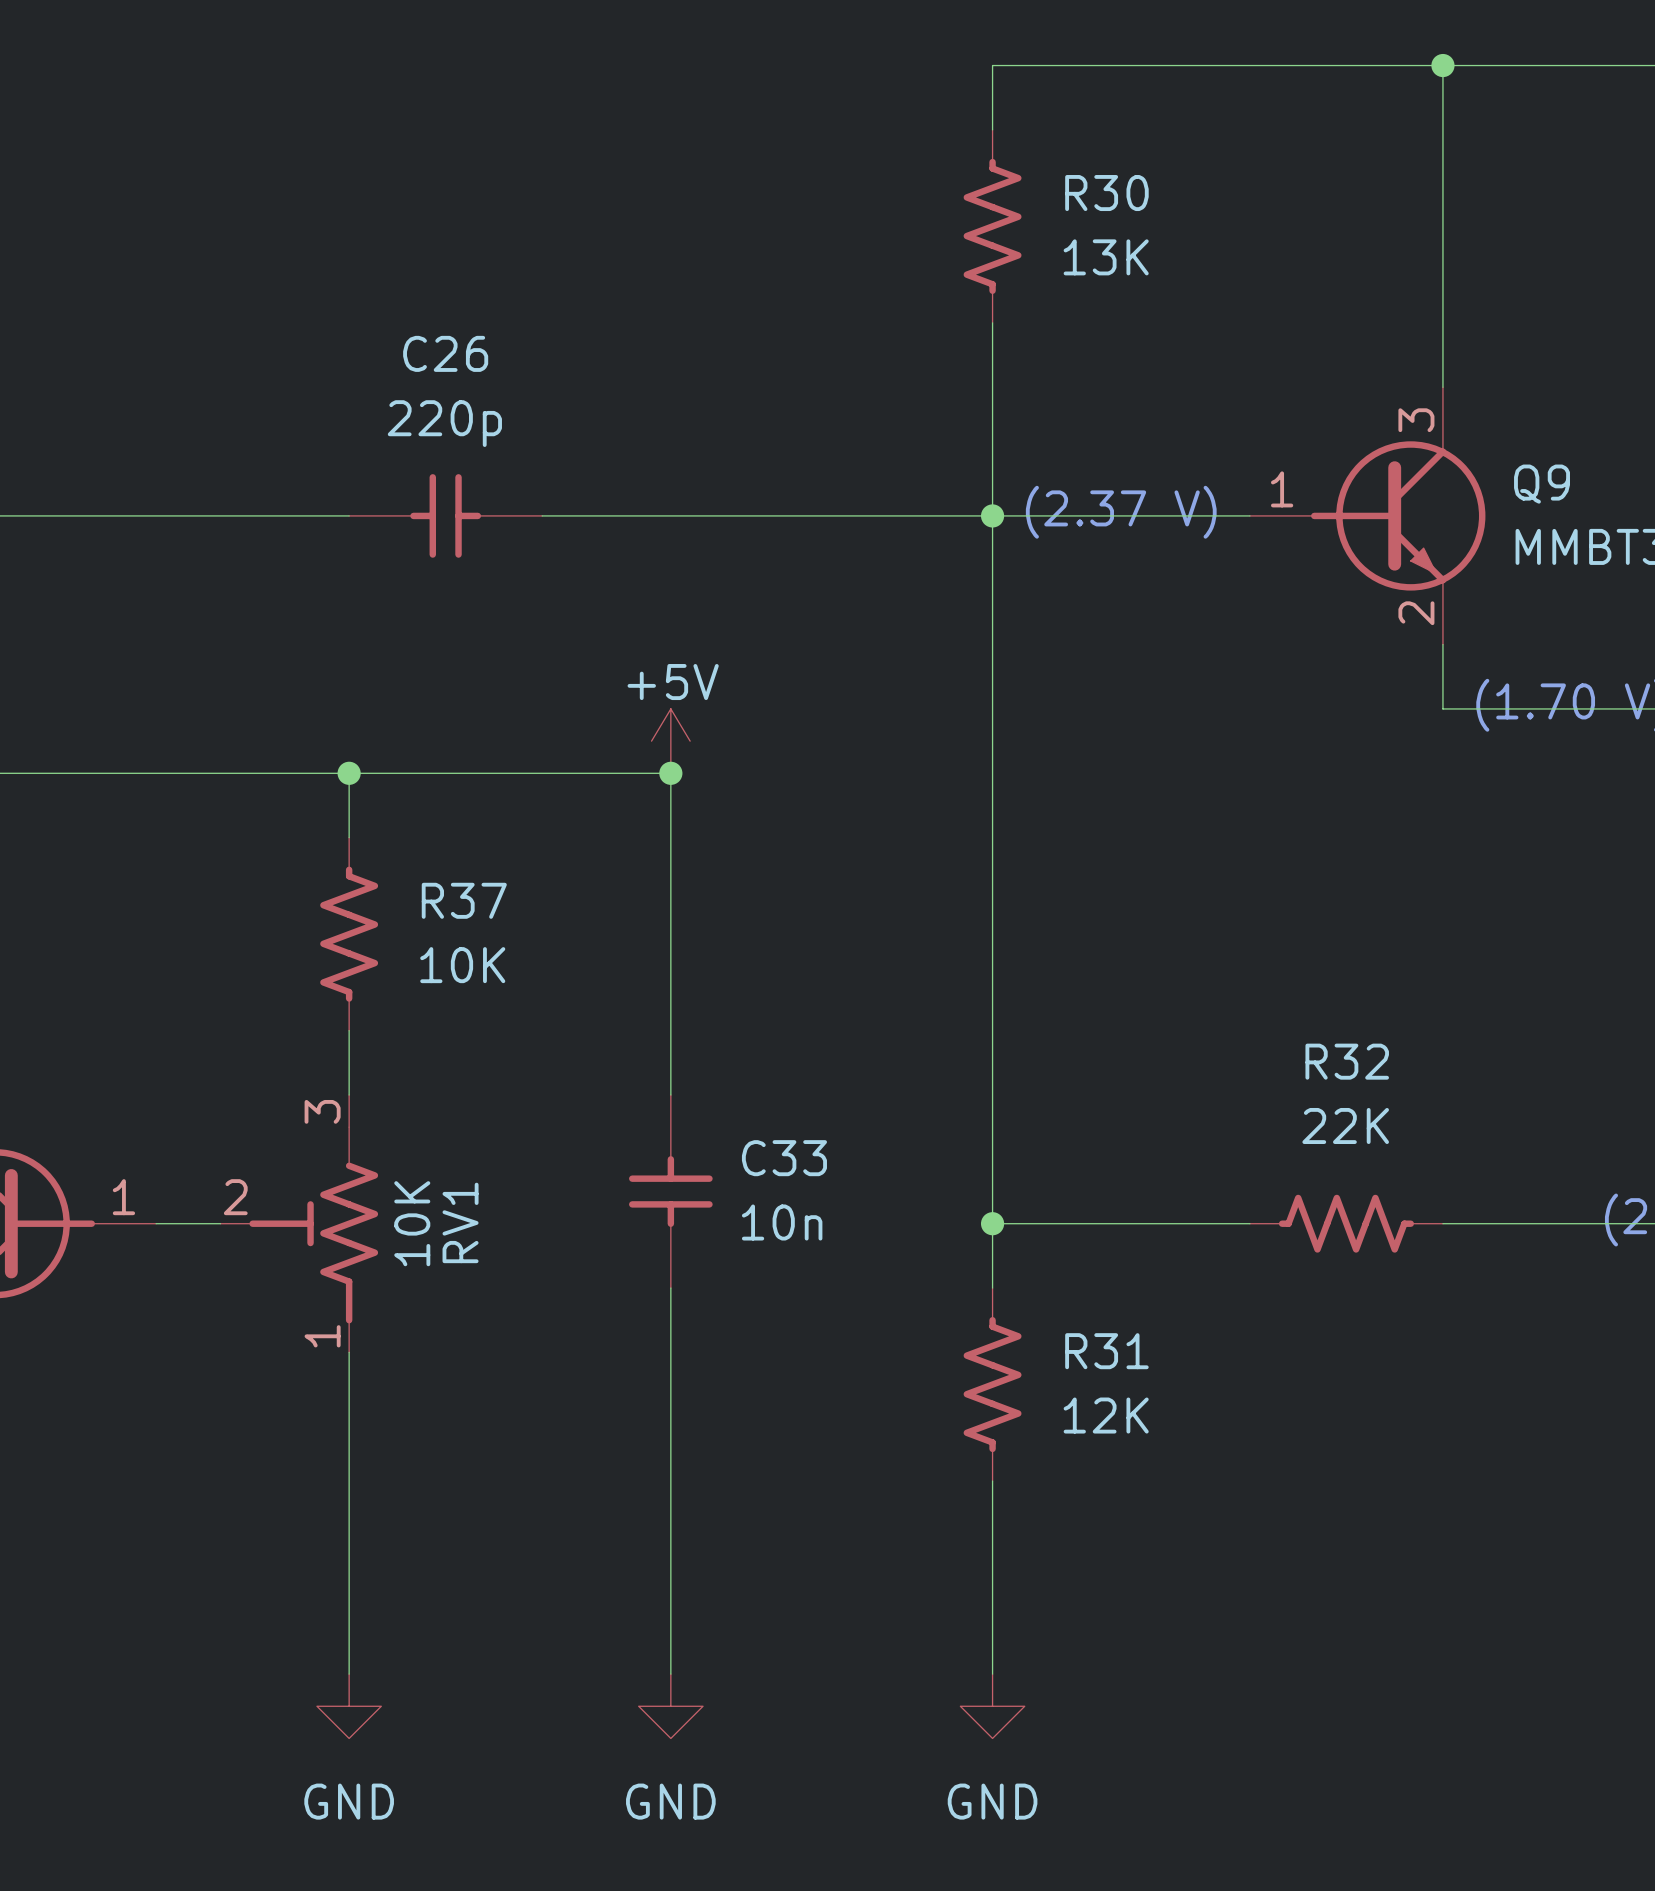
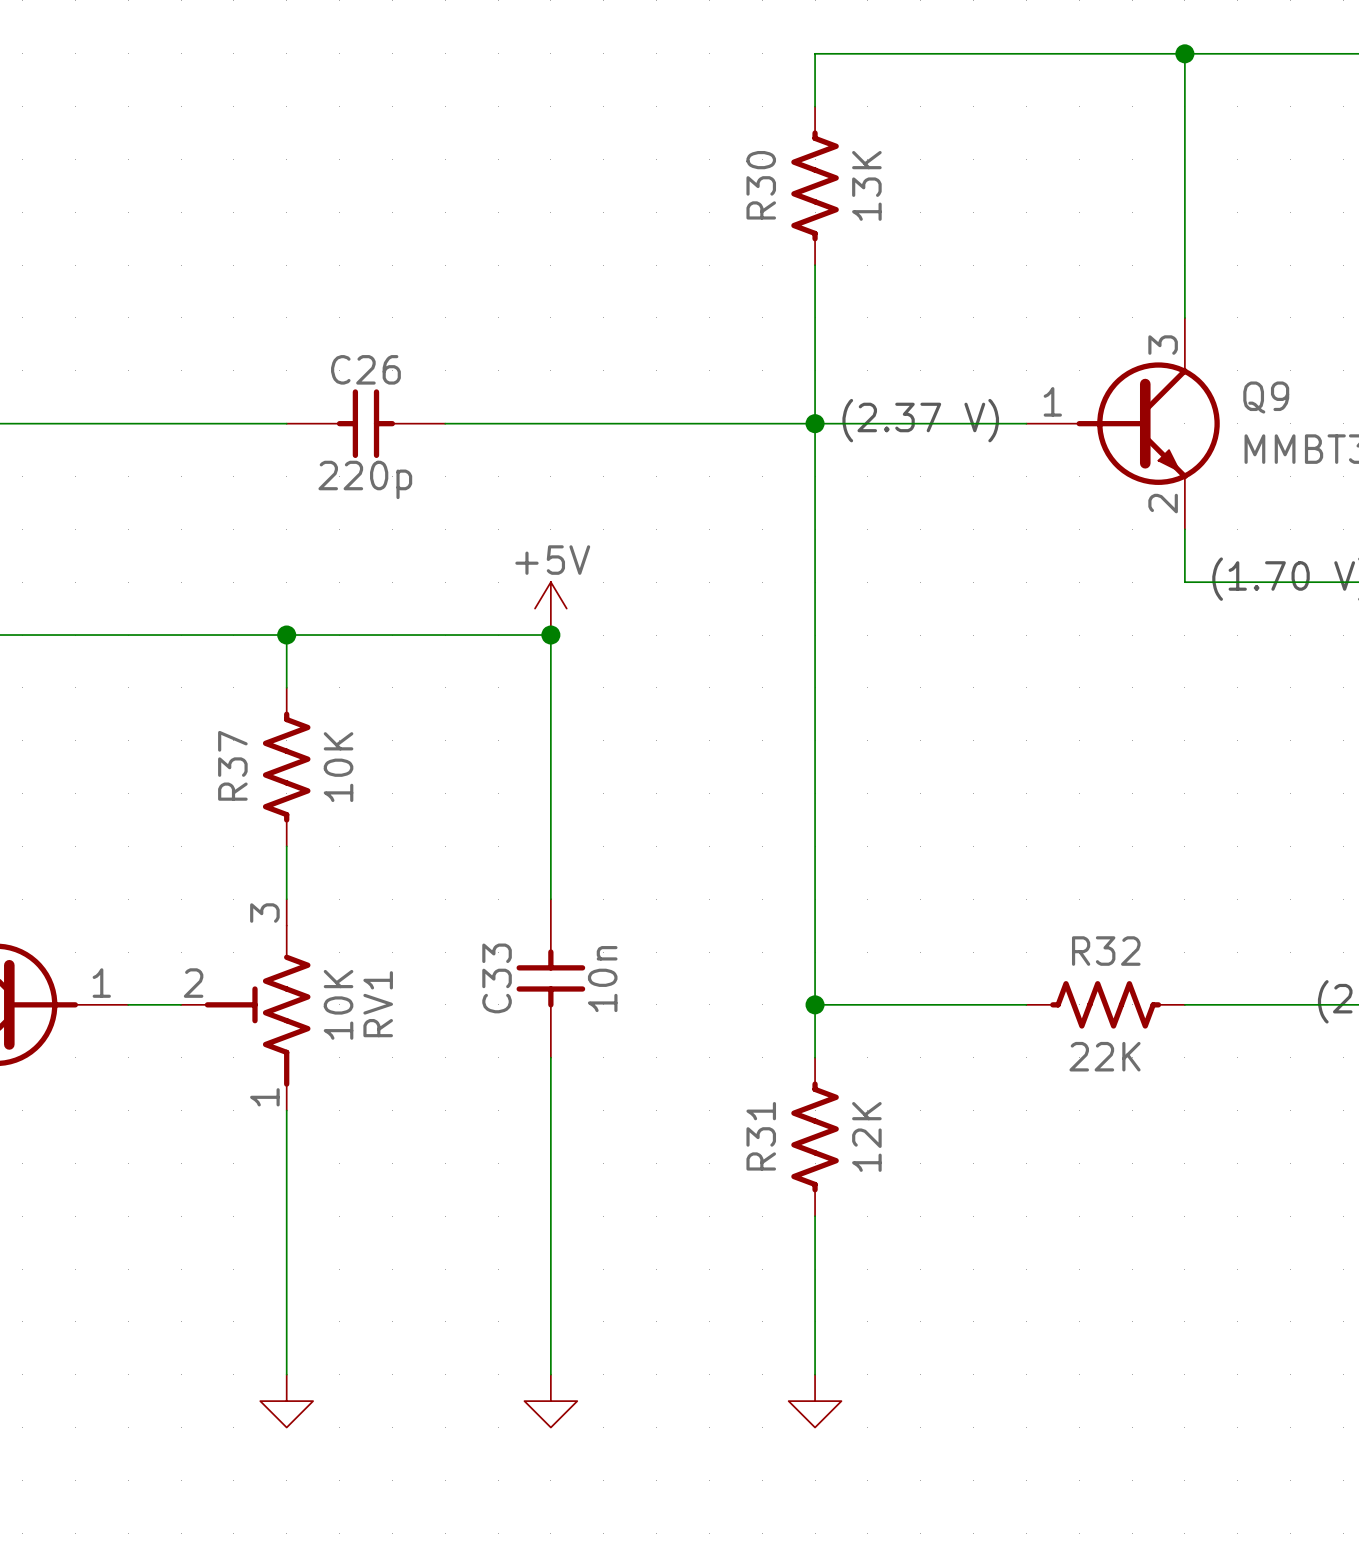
R30 name rotation: 0° (1106, 193) -> 90° counterclockwise (761, 185)
R30 name position: R30 (1106, 193) -> R30 (761, 185)
R30 value rotation: 0° (1106, 257) -> 90° counterclockwise (866, 185)
C26 name position: C26 (445, 353) -> C26 (365, 369)
C26 value position: 220p (444, 423) -> 220p (365, 479)
R37 name rotation: 0° (464, 900) -> 90° counterclockwise (232, 765)
R37 name position: R37 (464, 900) -> R37 (232, 765)
R37 value rotation: 0° (462, 965) -> 90° counterclockwise (338, 767)
R32 name position: R32 (1347, 1061) -> R32 (1106, 951)
R32 value position: 22K (1345, 1125) -> 22K (1105, 1056)
C33 name rotation: 0° (784, 1158) -> 90° counterclockwise (497, 978)
C33 name position: C33 (784, 1158) -> C33 (497, 978)
C33 value rotation: 0° (782, 1222) -> 90° counterclockwise (602, 979)
R31 name rotation: 0° (1106, 1351) -> 90° counterclockwise (761, 1136)
R31 name position: R31 (1106, 1351) -> R31 (761, 1136)
R31 value rotation: 0° (1106, 1415) -> 90° counterclockwise (866, 1136)
power symbol text: GND (349, 1801) -> none
power symbol text: GND (670, 1801) -> none
power symbol text: GND (992, 1801) -> none

